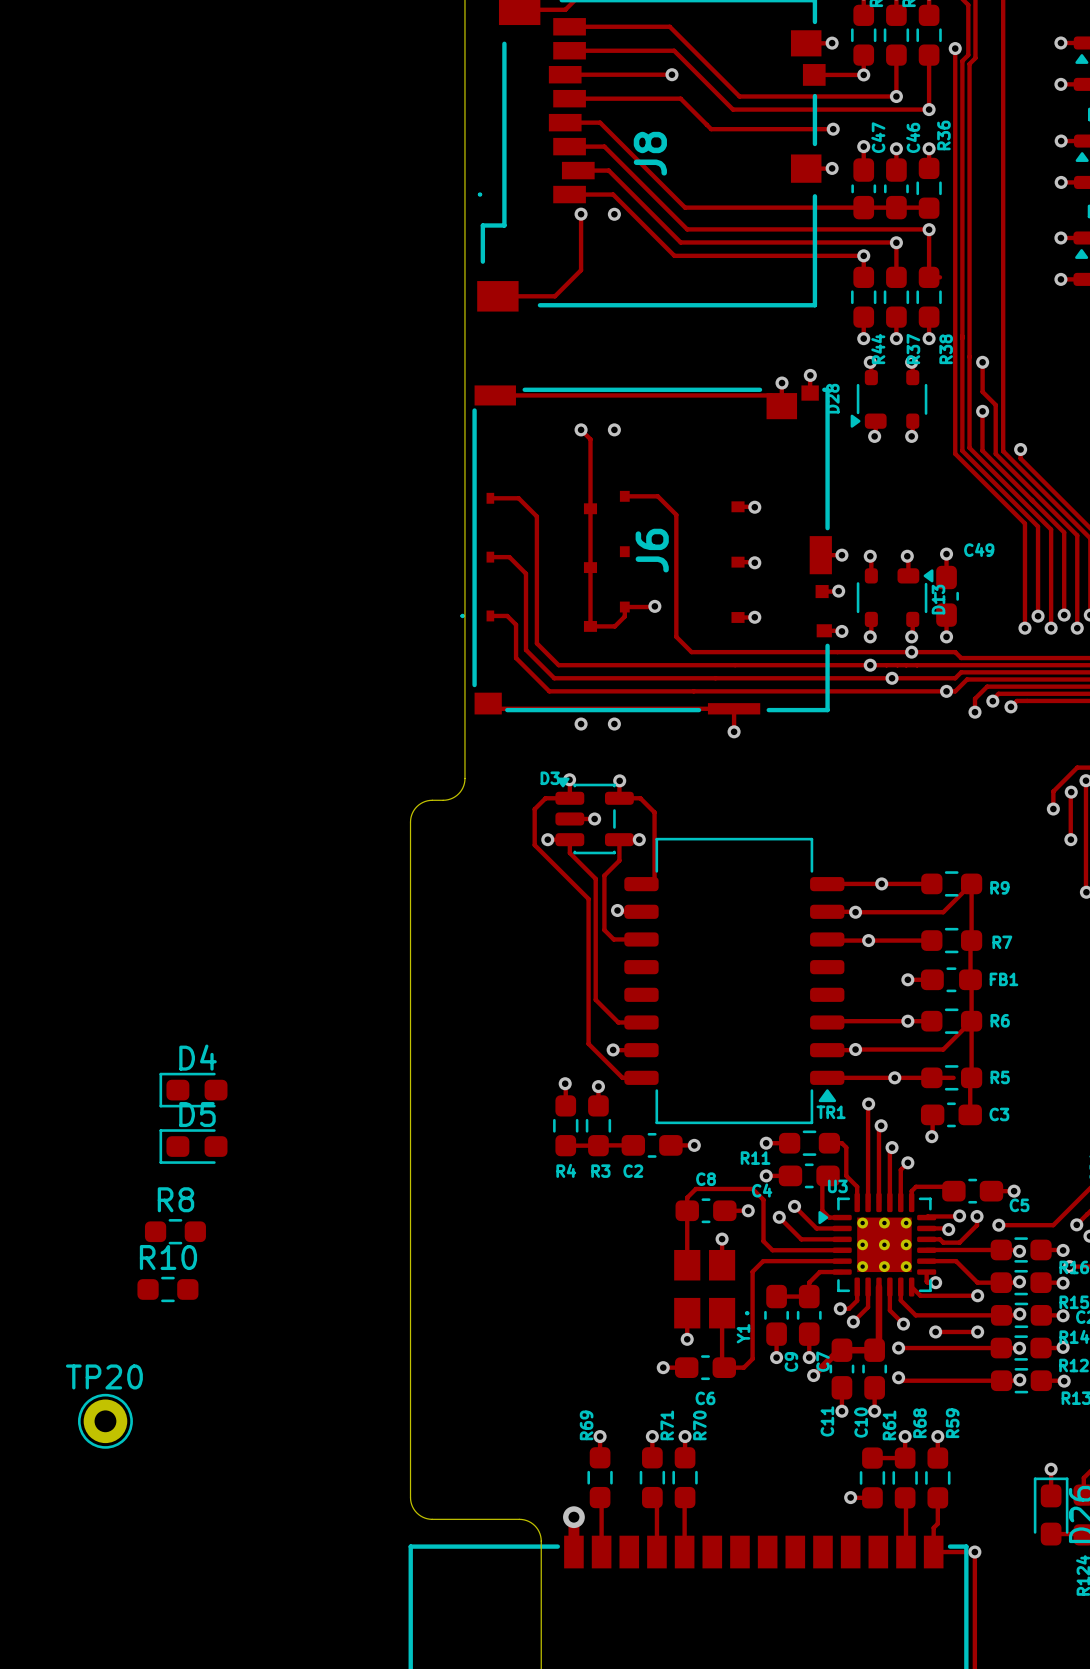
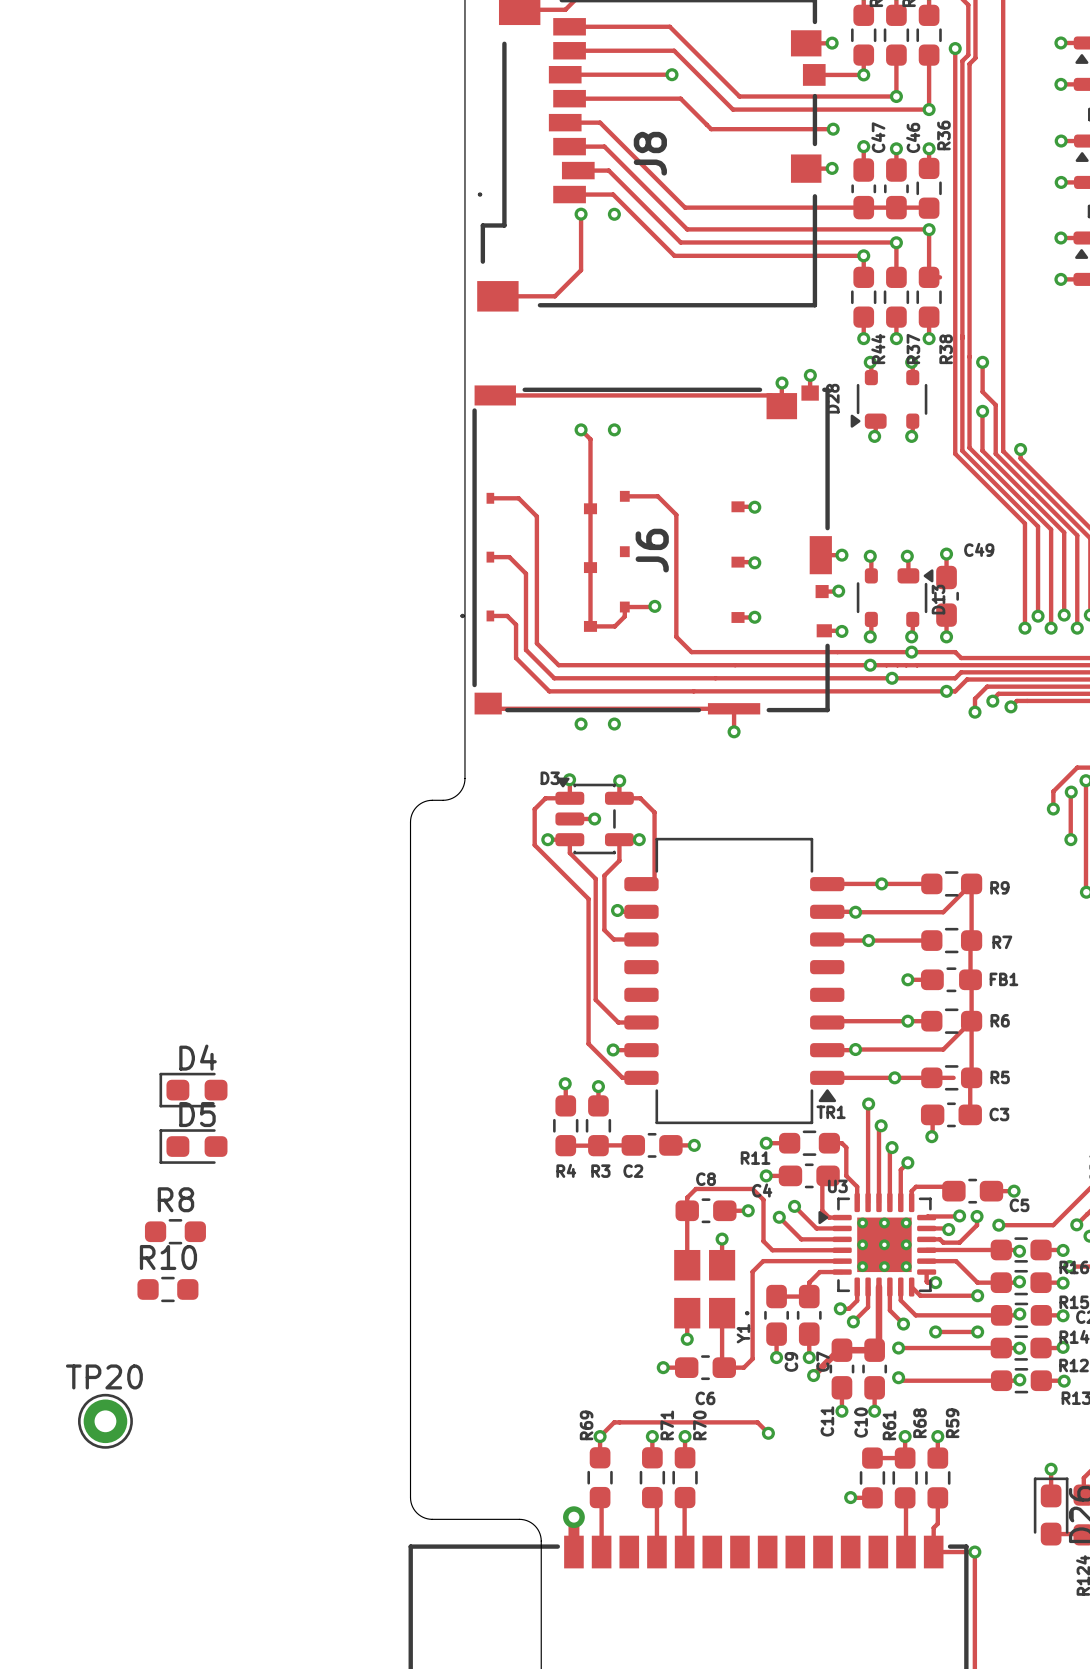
track: none -> (768, 1433) (757, 1422) (614, 1422) (600, 1436)
via: none -> (768, 1433)

